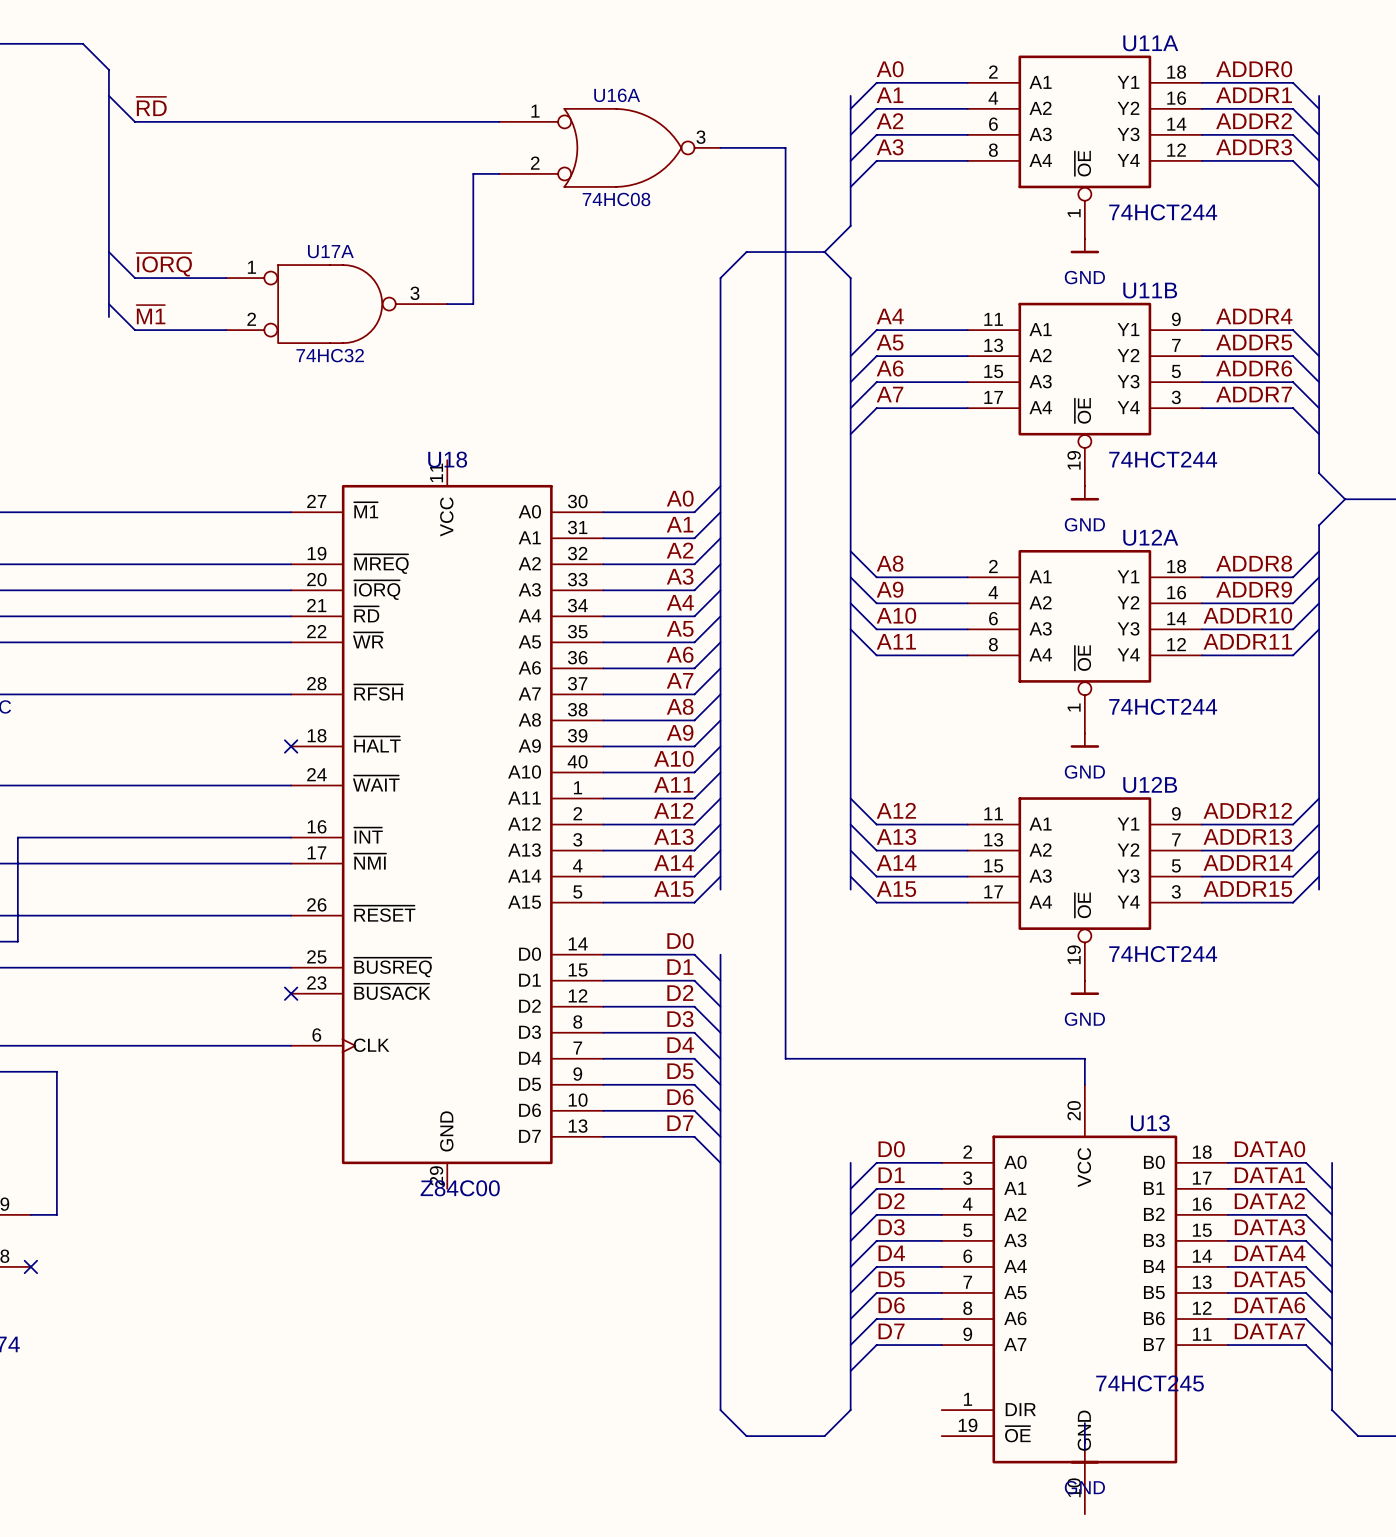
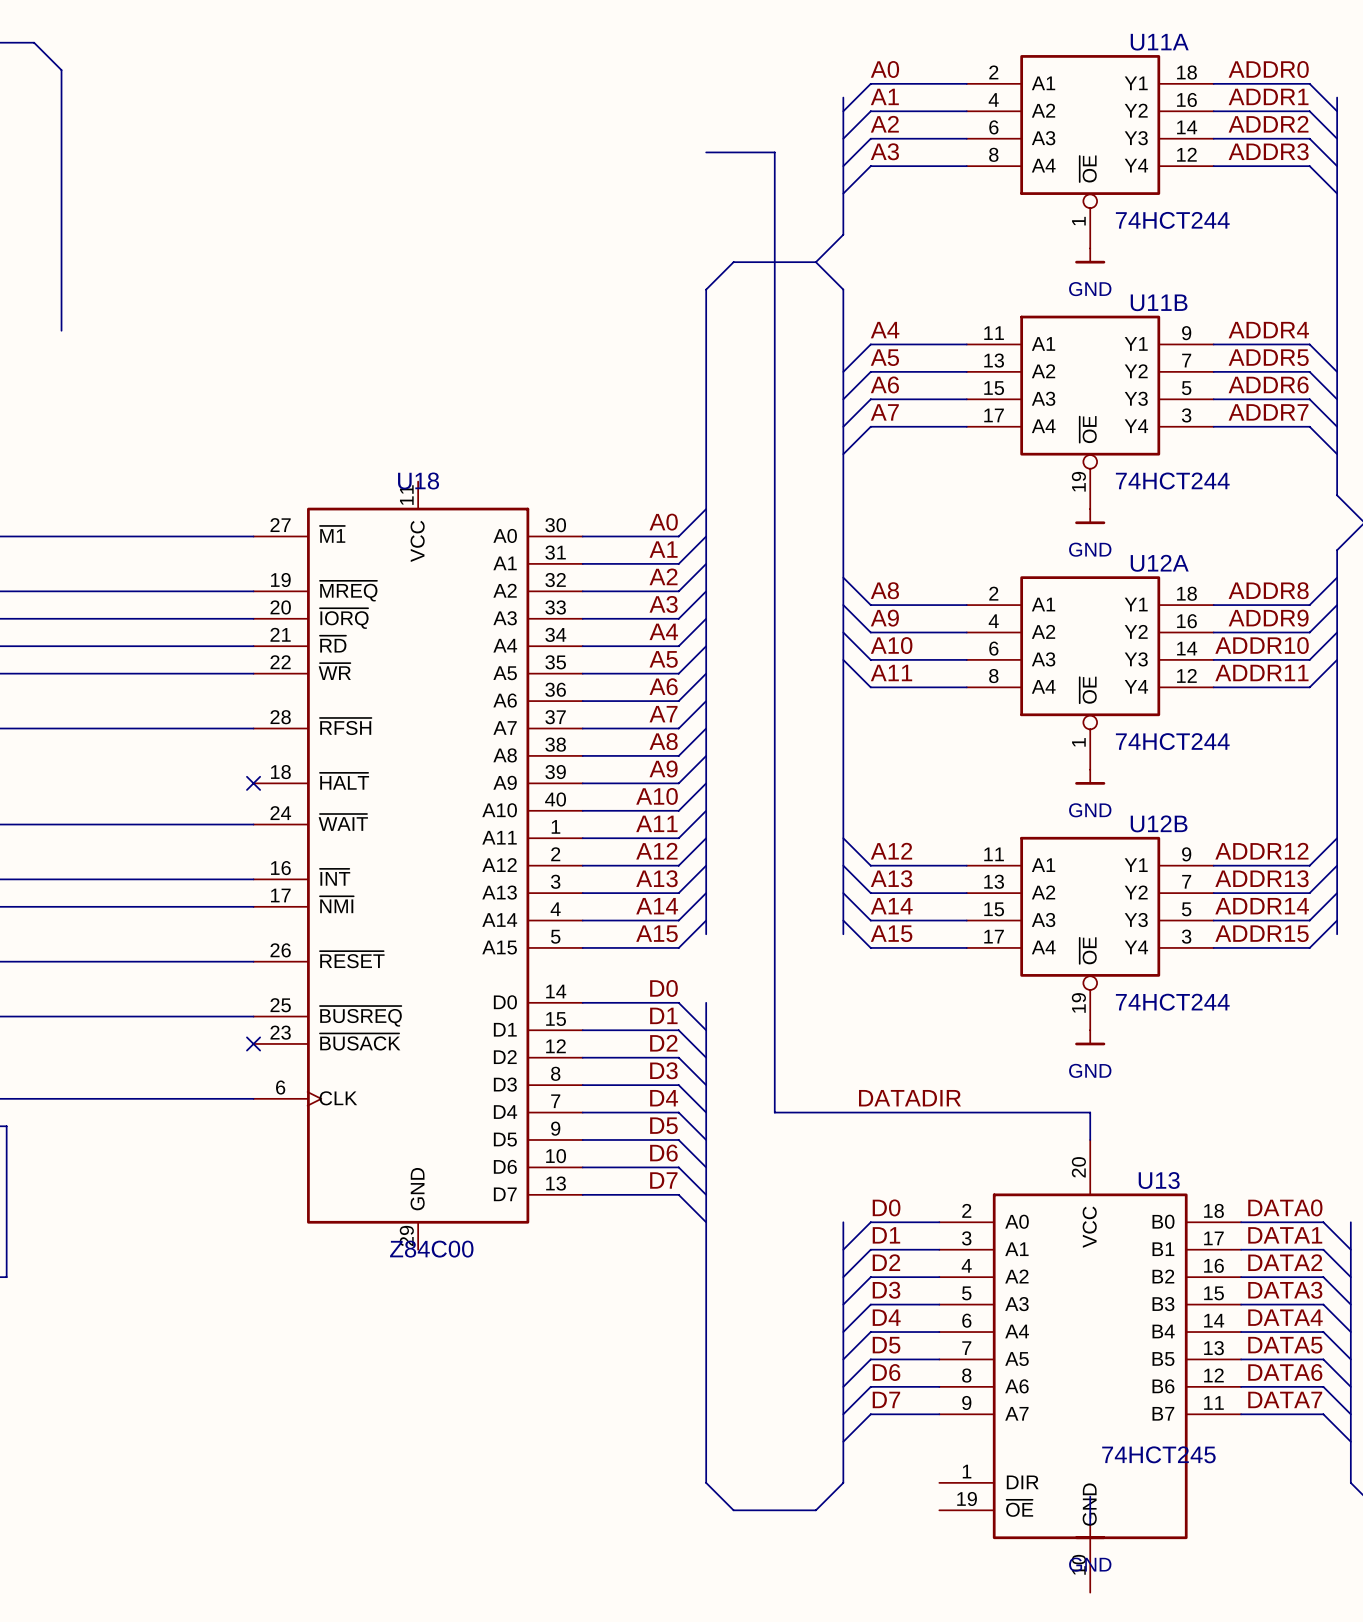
wire: (108, 95) (134, 121) (499, 121) -> none
label: ~{RD} (151, 106) -> none
U16A: 74HC08 (609, 147) -> none
wire: (499, 173) (473, 173) (473, 304) (447, 304) -> none
wire: (108, 252) (134, 278) (226, 278) -> none
label: ~{IORQ} (164, 264) -> none
wire: (108, 304) (134, 330) (226, 330) -> none
U17A: 74HC32 (336, 304) -> none
label: ~{M1} (150, 314) -> none
label: none -> DATADIR (909, 1098)

